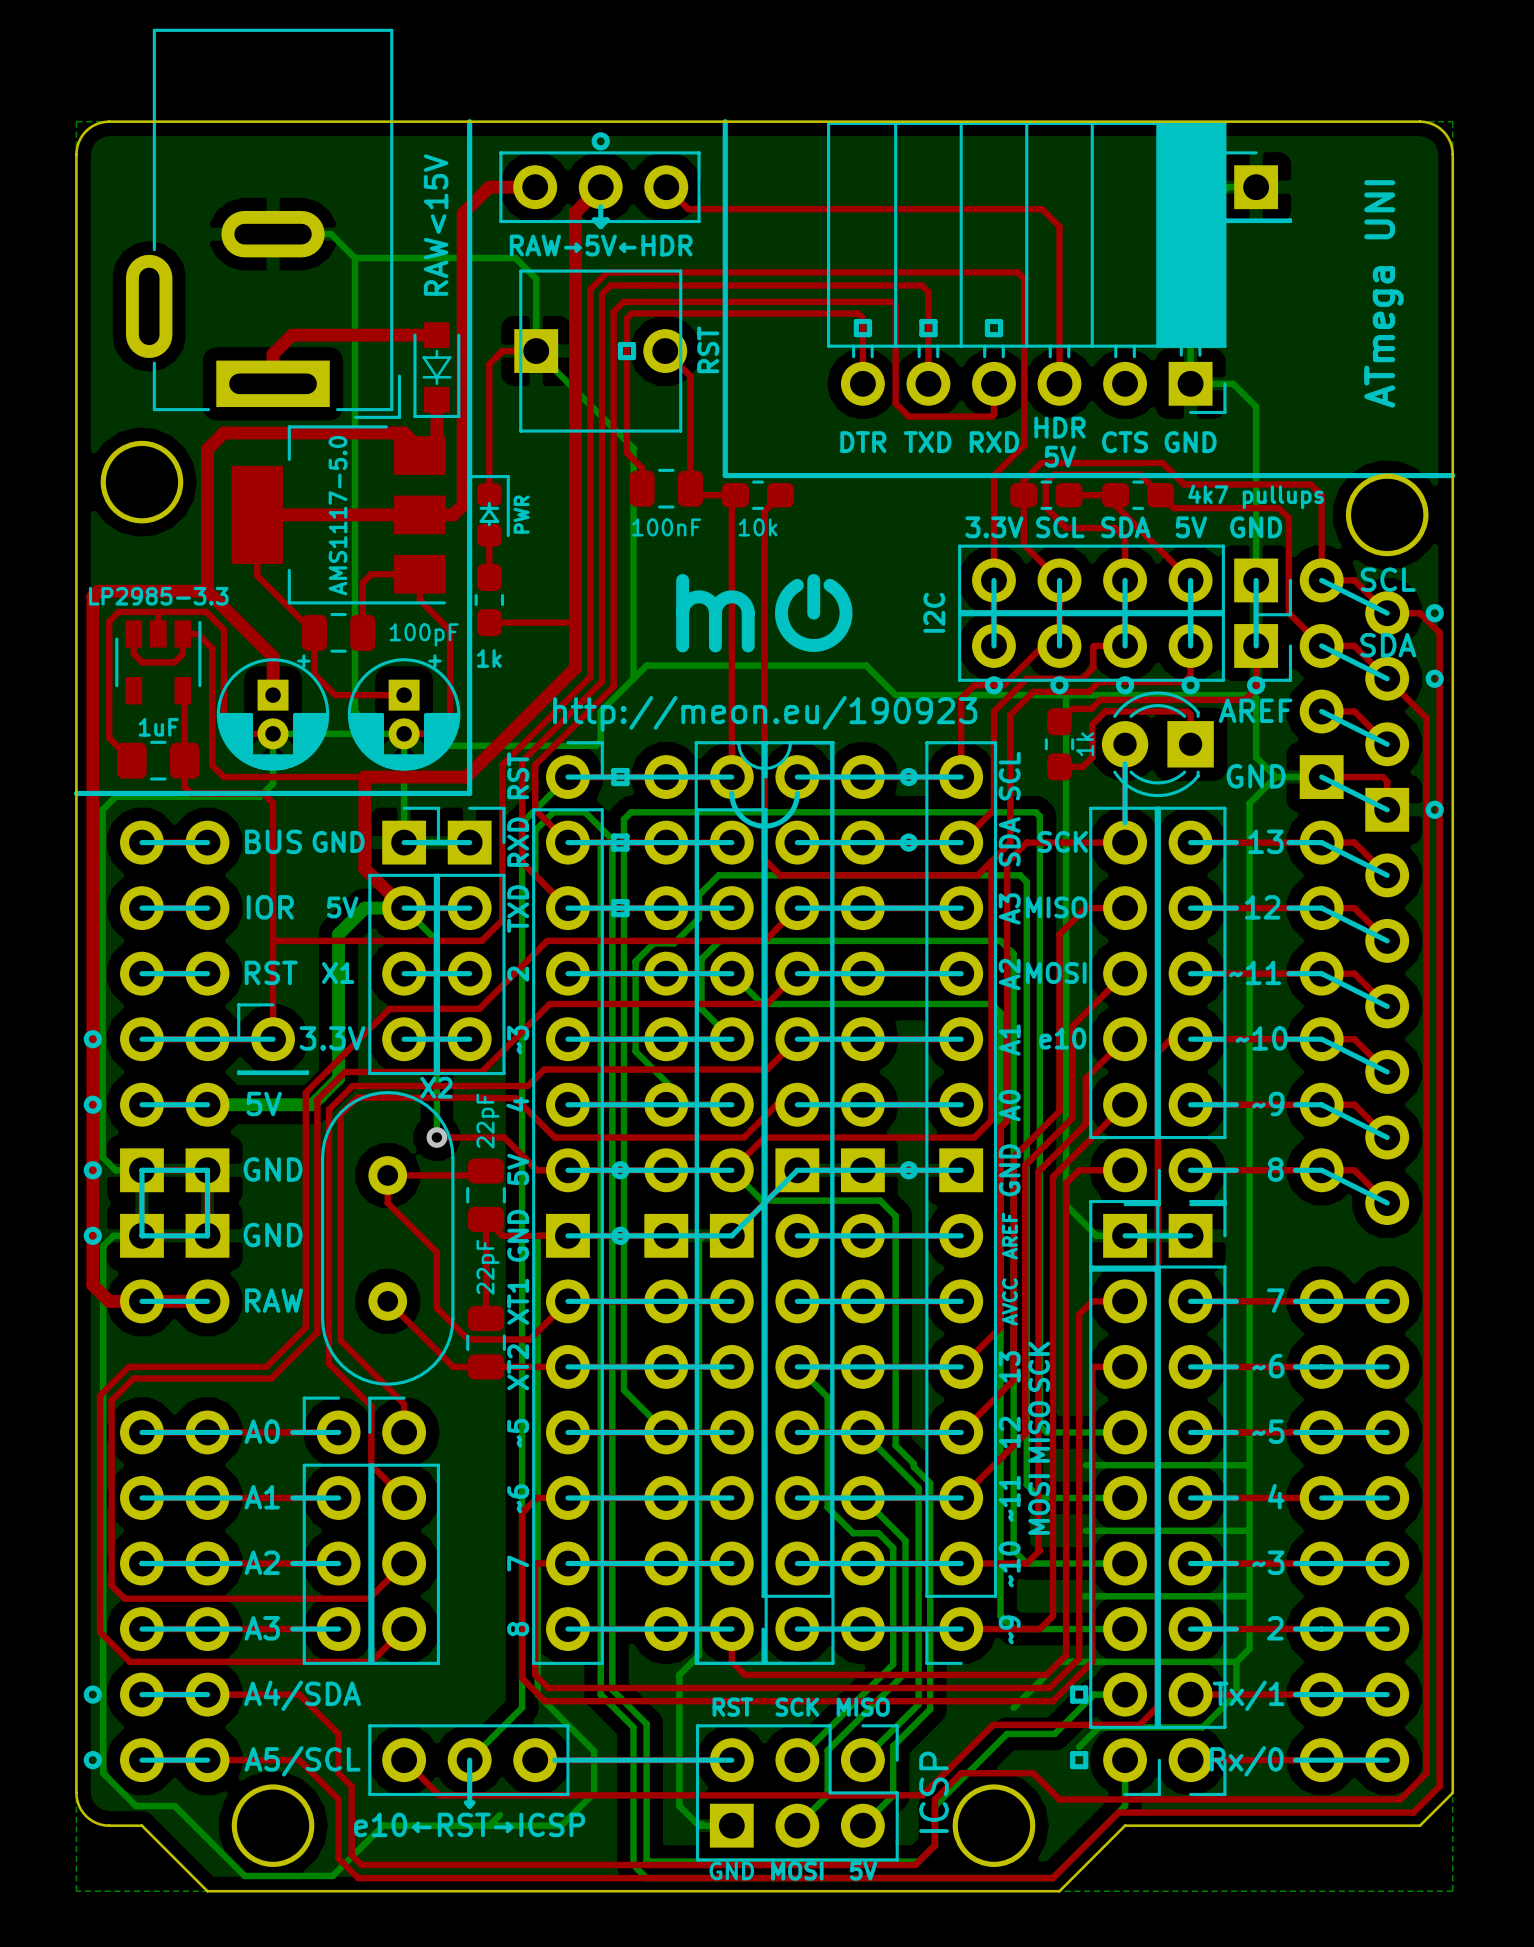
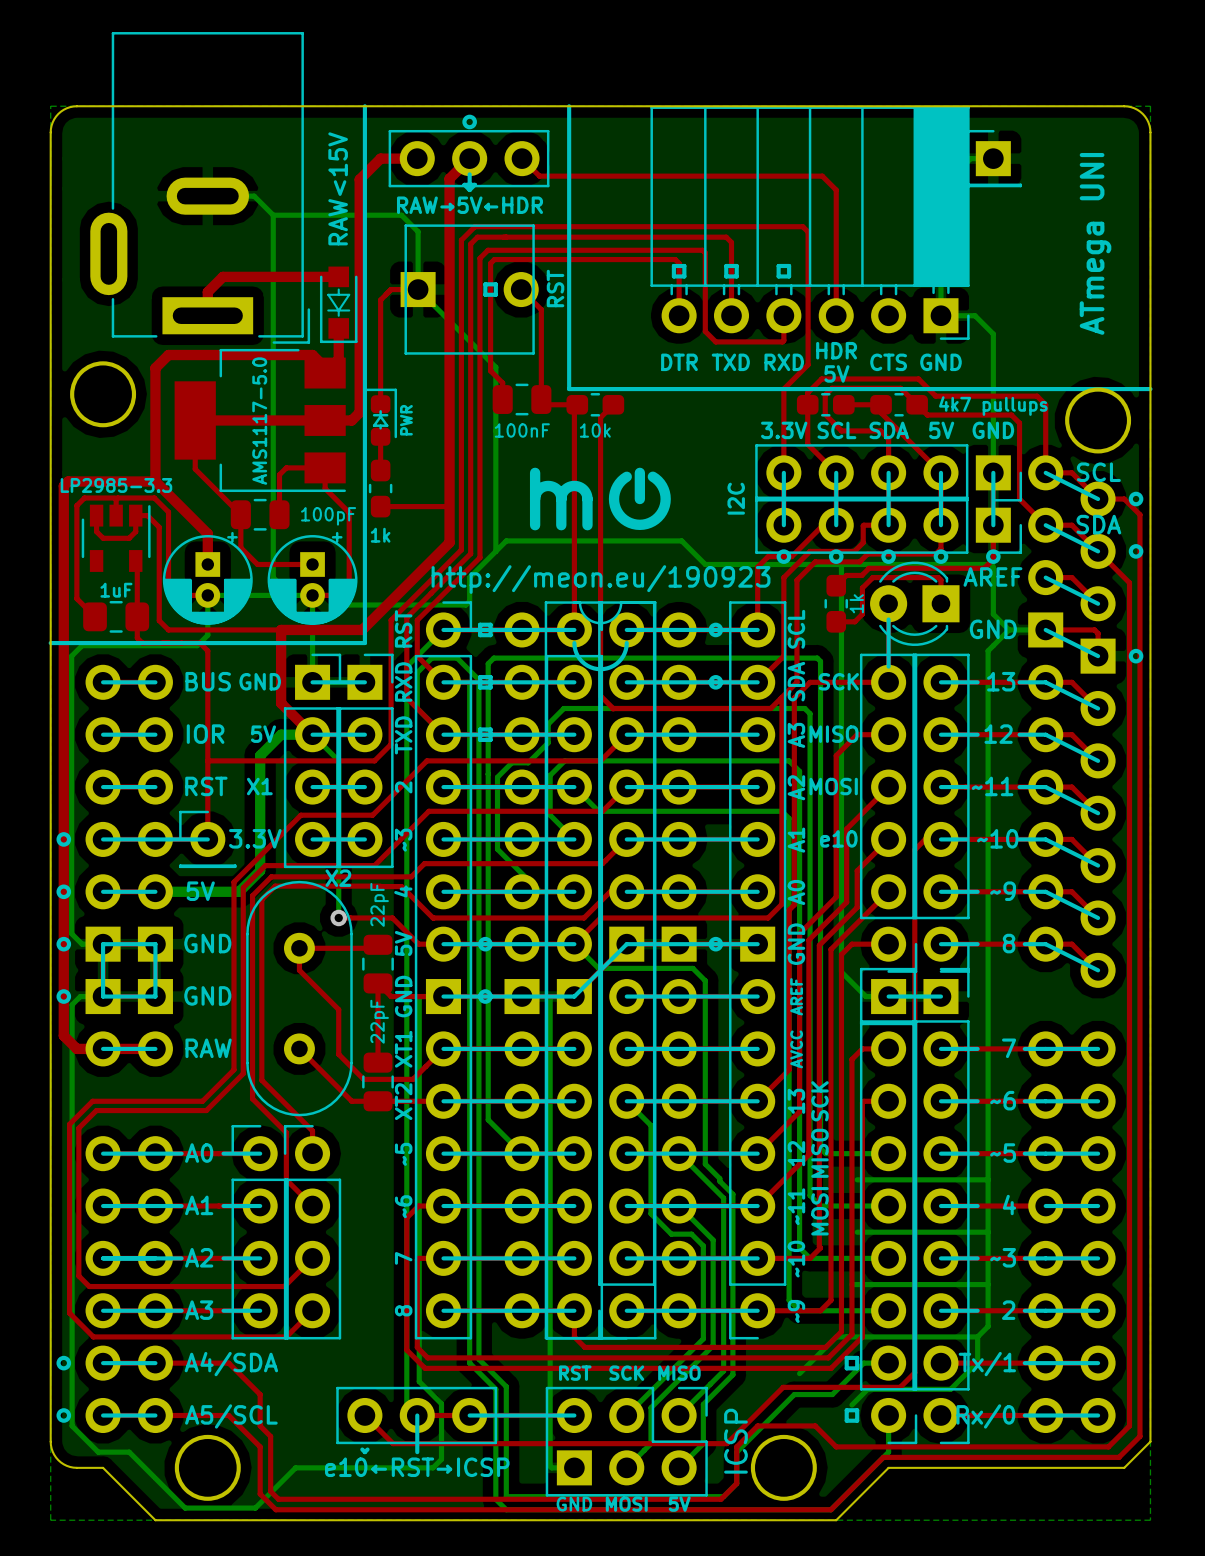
bottom track: (701, 1237) (699, 1240) (699, 1655) (679, 1674) (679, 1806) (699, 1825) (703, 1825) -> (550, 998) (550, 1466)
bottom track: (537, 1694) (594, 1751) (594, 1792) (561, 1825) (554, 1825) -> (419, 1363) (419, 1381) (441, 1403) (441, 1459) (432, 1467)
bottom track: (522, 1707) (469, 1760) -> (406, 1373) (406, 1405)
top track: (404, 1760) (439, 1795) (504, 1795) -> (364, 1415) (393, 1443)
part position: (468, 1760) -> (416, 1415)
line: (469, 1760) (469, 1806) -> (417, 1415) (417, 1452)
line: (554, 1760) (600, 1760) -> none
bottom track: (499, 1815) (489, 1825) -> none
text position: e10←RST→ICSP (469, 1824) -> e10←RST→ICSP (417, 1467)

